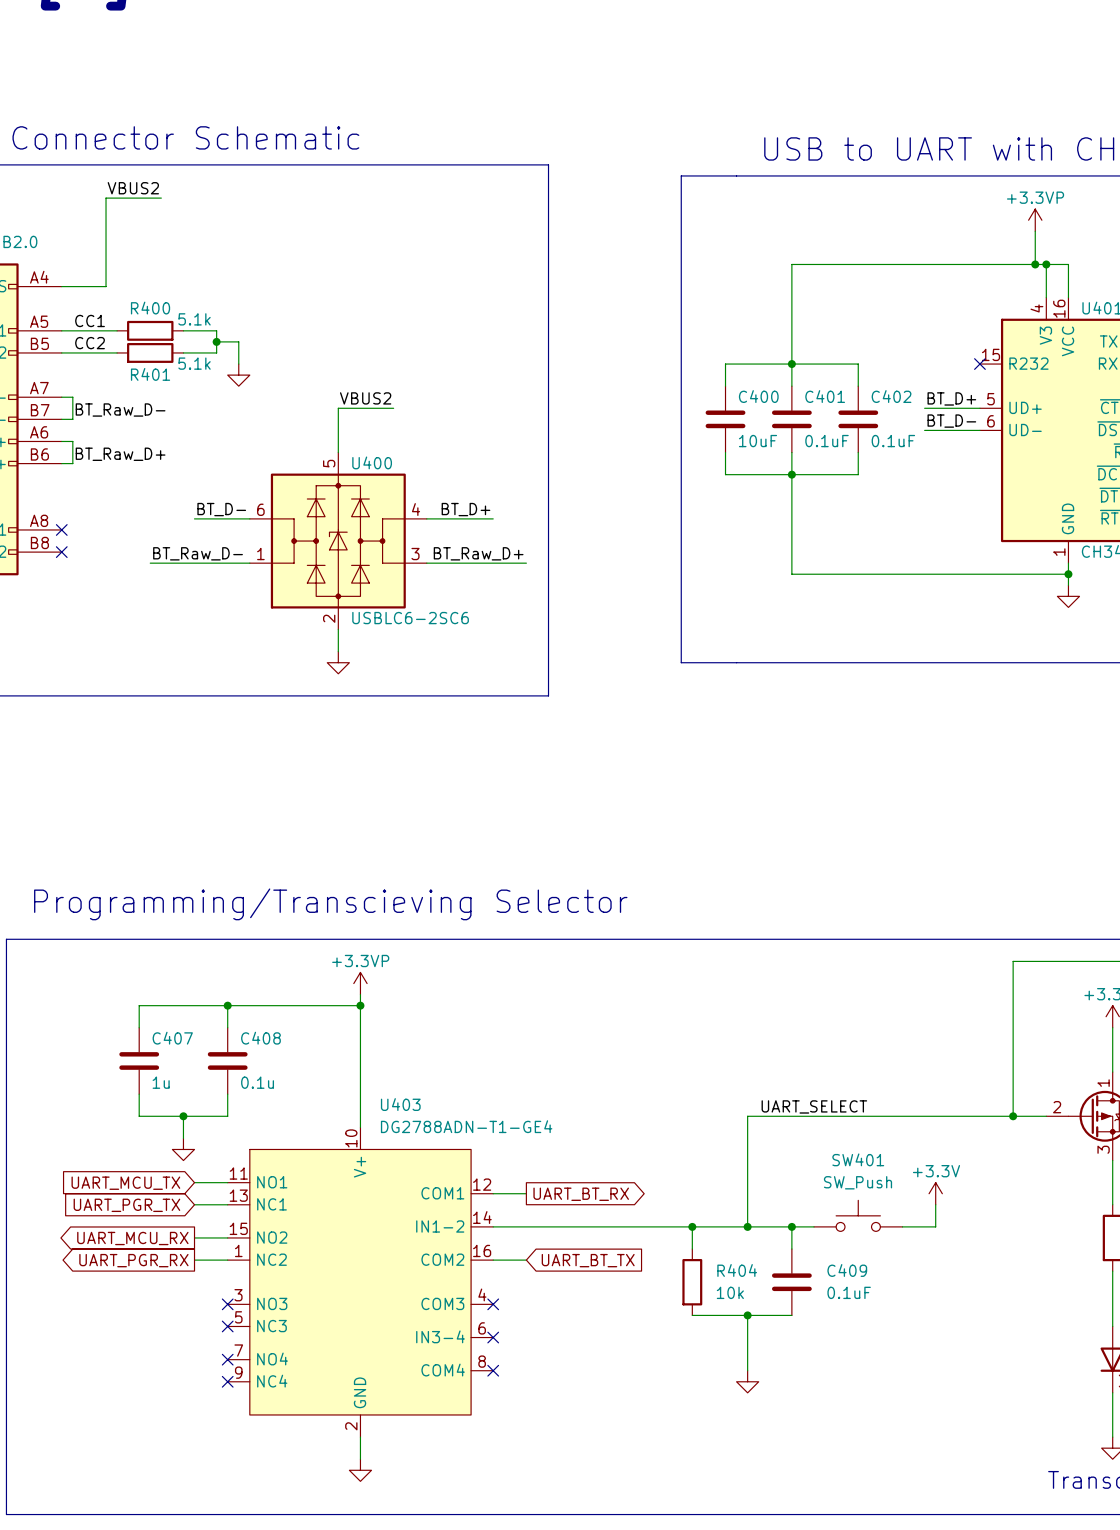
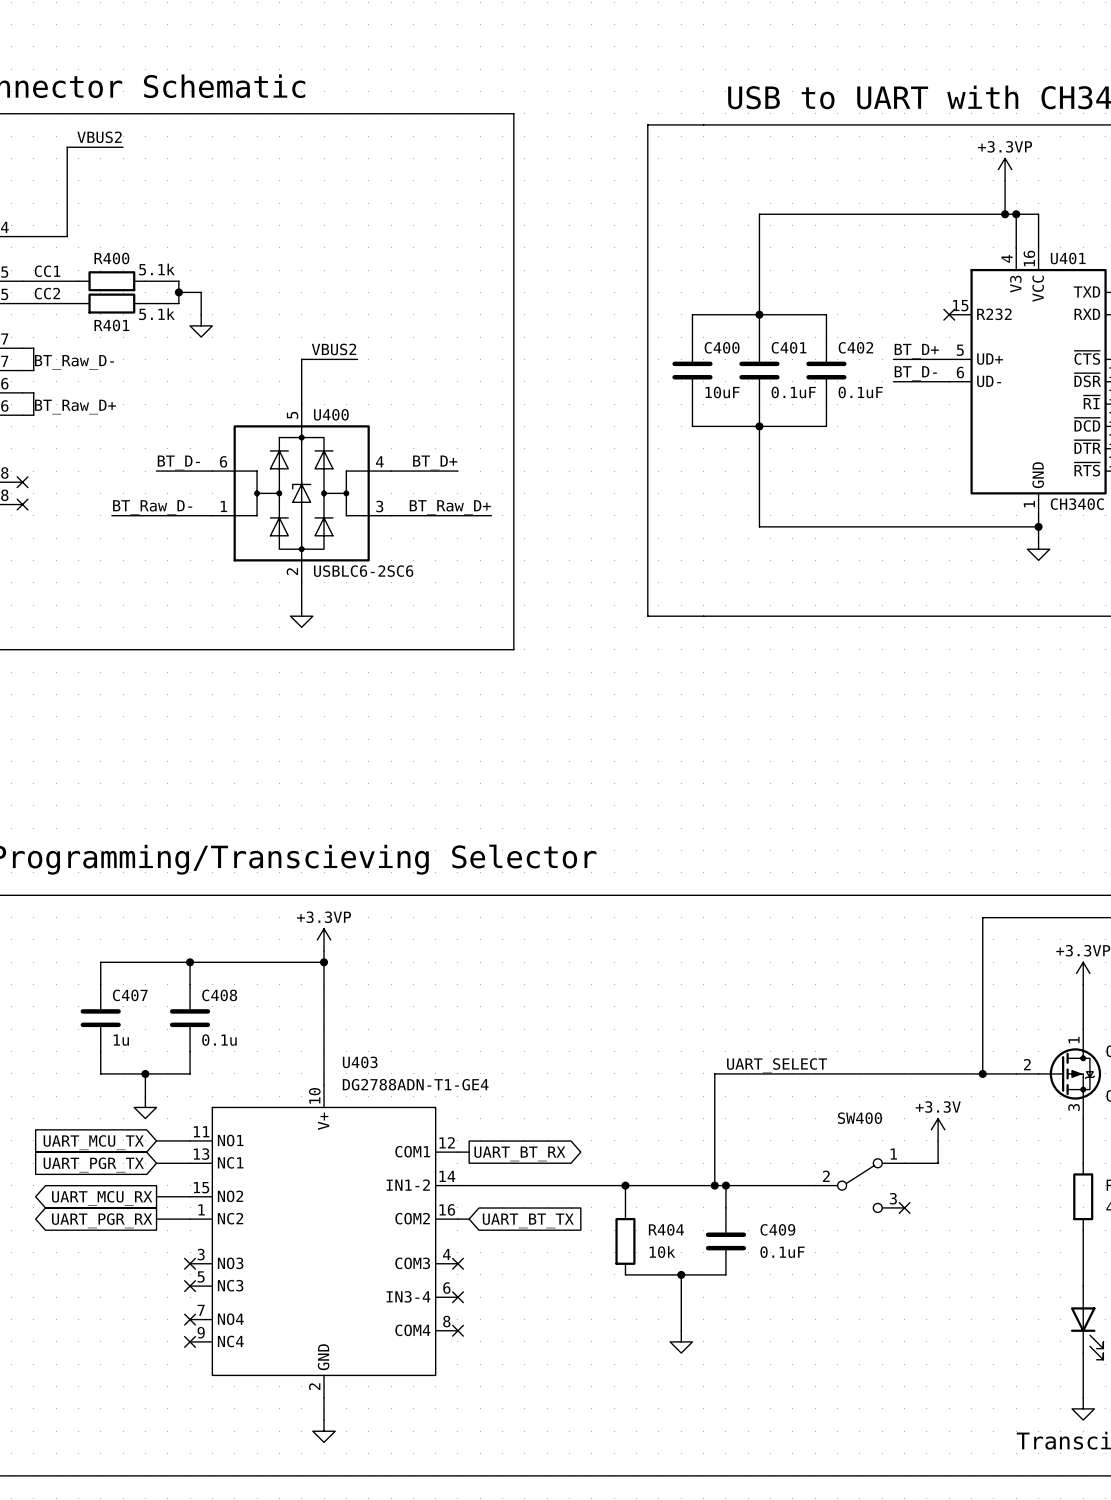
wire: (504, 1193) (526, 1193) -> none
power symbol position: +3.3V (935, 1193) -> +3.3V (938, 1129)
global label position: UART_BT_RX (581, 1194) -> UART_BT_RX (519, 1153)
wire: (935, 1204) (935, 1226) (902, 1226) -> (904, 1163) (938, 1163) (938, 1140)
SW401: SW_Push (858, 1215) -> none
junction: none -> (625, 1185)
wire: (692, 1226) (692, 1249) -> (625, 1185) (625, 1207)
junction: (692, 1226) -> none
junction: none -> (725, 1185)
wire: (791, 1226) (791, 1249) -> (725, 1185) (725, 1207)
junction: (791, 1226) -> none
SW400: none -> (859, 1185)
no-connect mark: none -> (904, 1207)
wire: (504, 1260) (526, 1260) -> none
global label position: UART_BT_TX (588, 1260) -> UART_BT_TX (528, 1220)
R404 position: (692, 1282) -> (625, 1241)
C409 position: (791, 1282) -> (725, 1241)
wire: (747, 1315) (747, 1370) -> (681, 1274) (681, 1330)
junction position: (747, 1315) -> (681, 1274)
wire: (758, 1315) (791, 1315) -> (625, 1274) (658, 1274)
power symbol position: (747, 1381) -> (681, 1341)

